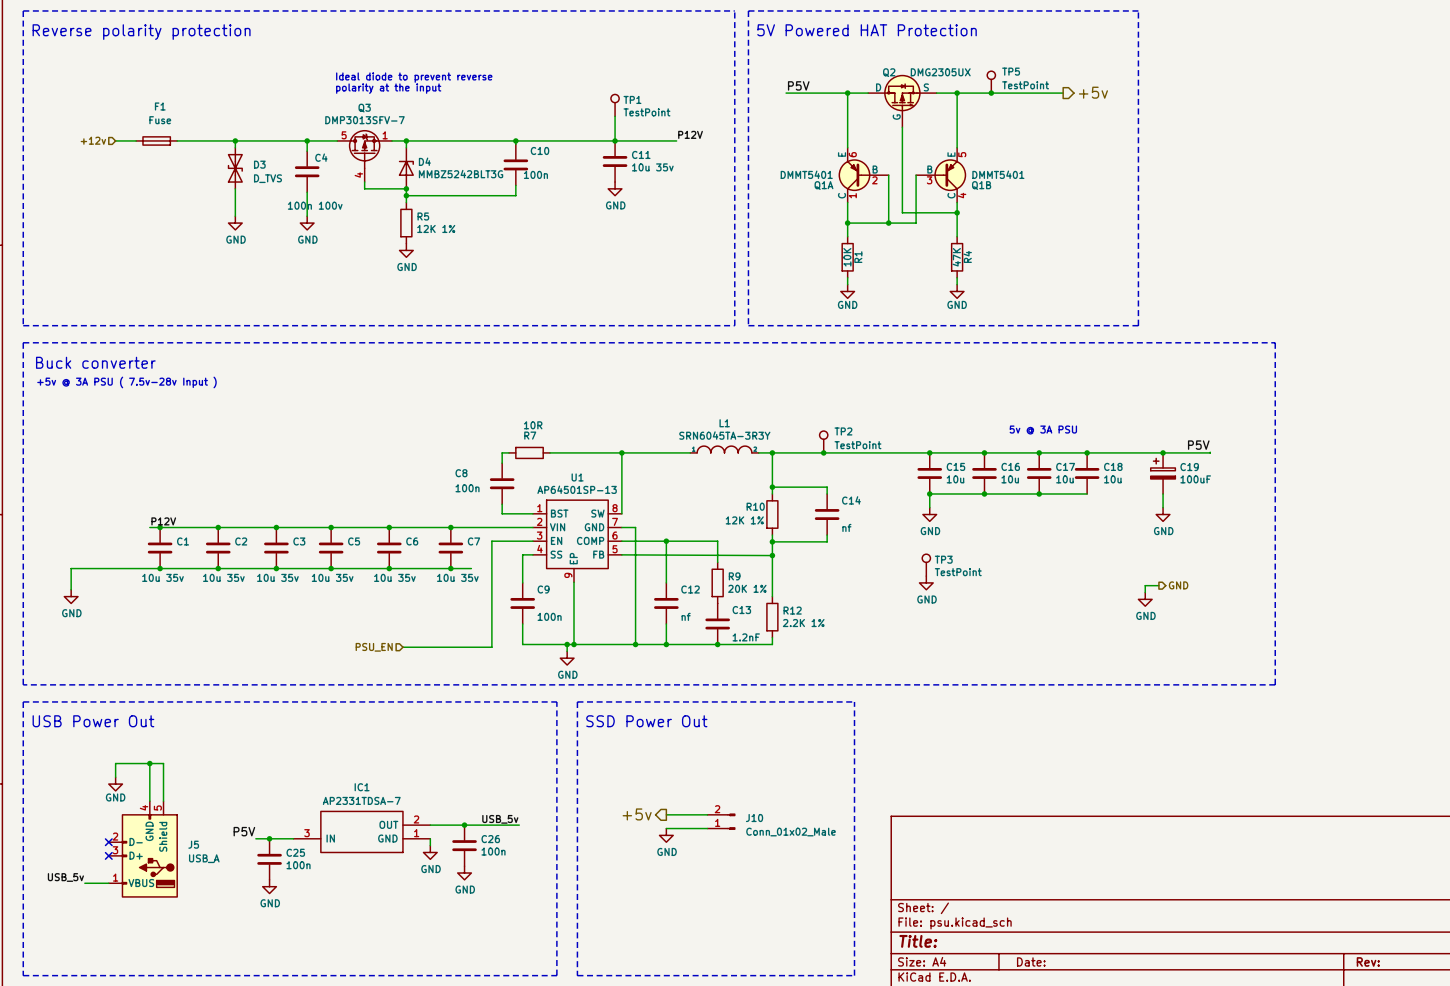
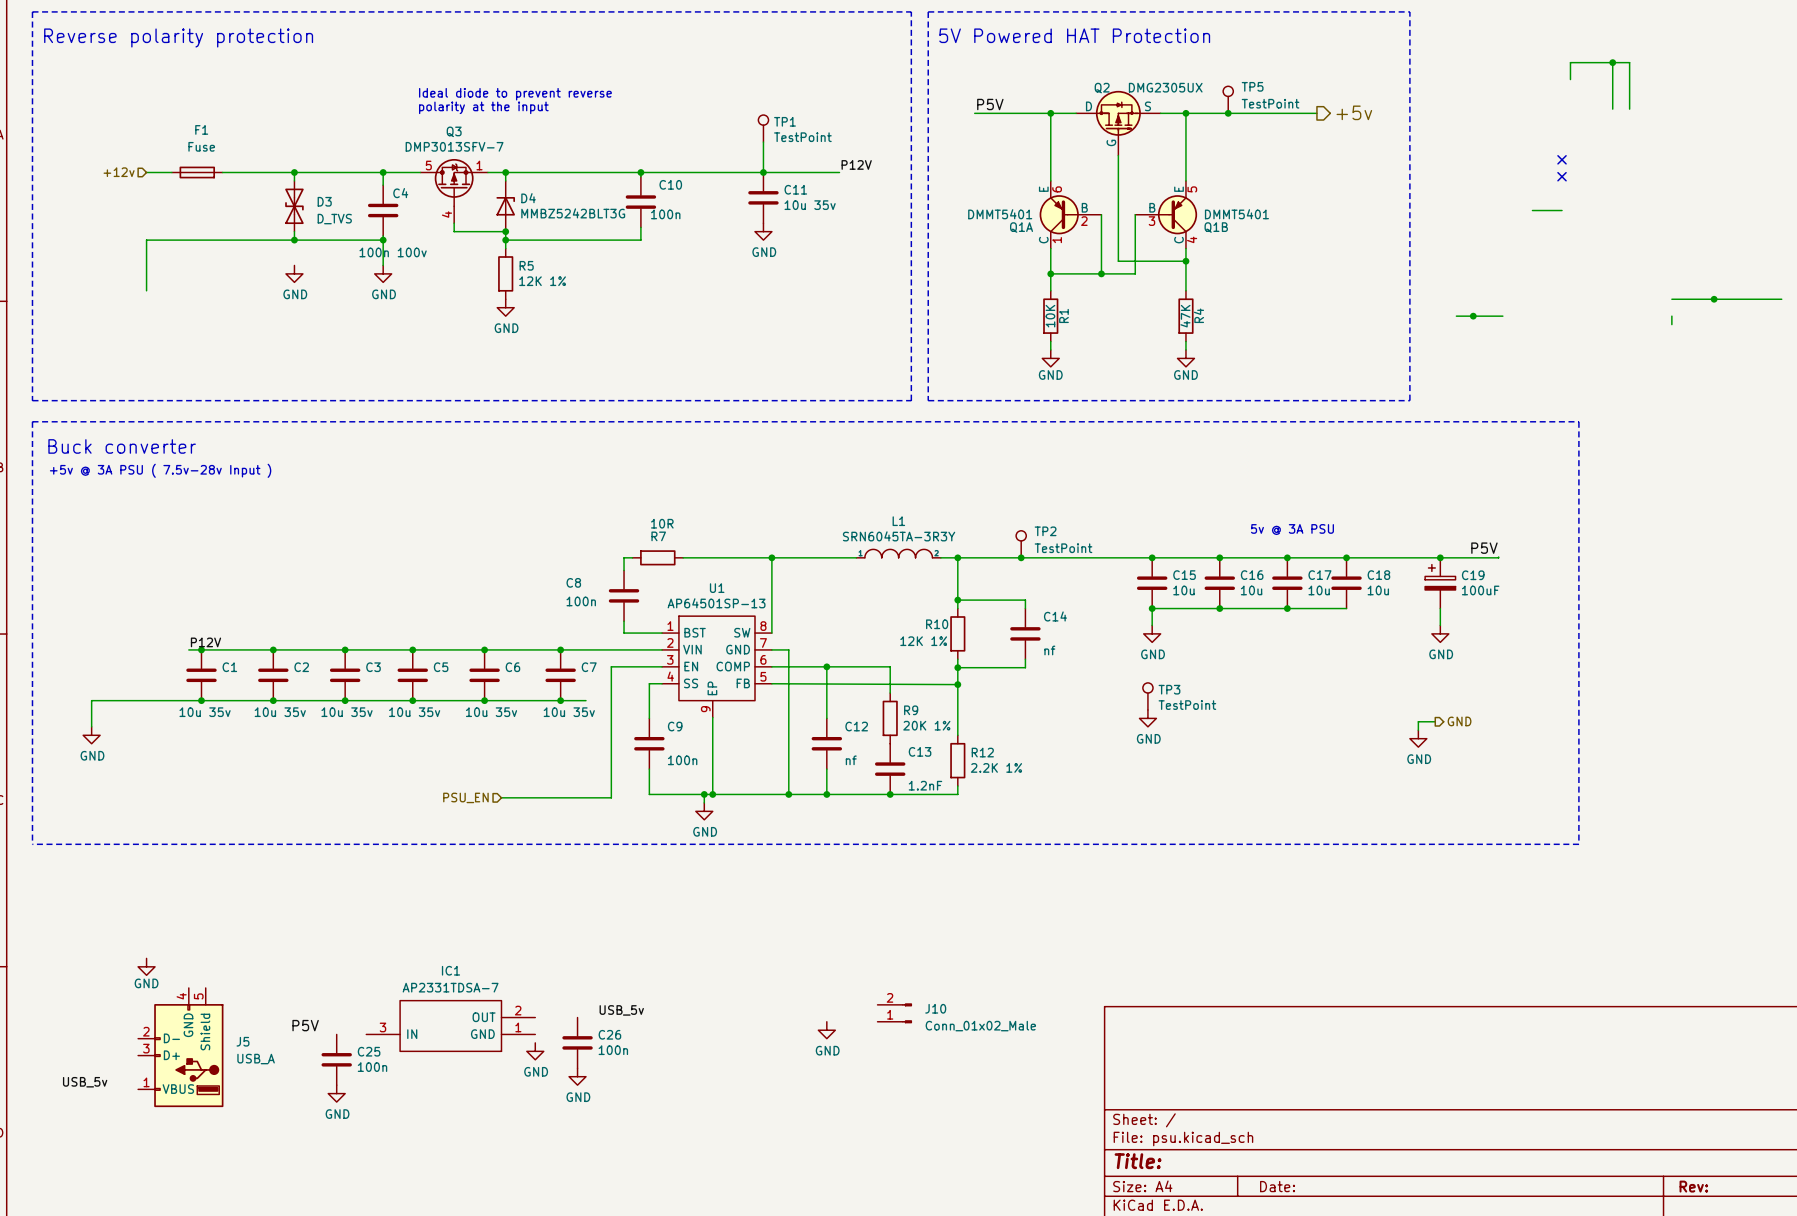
wire: none -> (1612, 62) (1612, 109)
junction: none -> (1612, 62)
wire: none -> (1570, 79) (1570, 62) (1629, 62) (1629, 109)
no-connect mark: none -> (1562, 159)
no-connect mark: none -> (1562, 176)
wire: none -> (1532, 210) (1562, 210)
wire: (235, 195) (235, 216) -> none
junction: none -> (294, 240)
wire: none -> (383, 240) (146, 240) (146, 290)
junction: none -> (383, 240)
wire: none -> (1671, 299) (1781, 299)
junction: none -> (1714, 299)
wire: none -> (1456, 316) (1502, 316)
junction: none -> (1473, 316)
wire: none -> (1671, 316) (1671, 324)
line: (23, 701) (23, 975) (556, 975) (556, 701) (23, 701) -> none
line: (577, 701) (854, 701) (854, 975) (577, 975) (577, 701) -> none
text: USB Power Out (93, 721) -> none
text: SSD Power Out (646, 721) -> none
wire: (149, 763) (149, 801) -> none
junction: (149, 763) -> none
wire: (115, 777) (115, 763) (163, 763) (163, 801) -> none
hierarchical label: +5v (637, 814) -> none
wire: (666, 814) (707, 814) -> none
wire: (430, 825) (519, 825) -> none
junction: (464, 825) -> none
wire: (666, 828) (707, 828) -> none
wire: (255, 838) (293, 838) -> none
junction: (269, 838) -> none
wire: (430, 838) (430, 845) -> none
no-connect mark: (108, 842) -> none
no-connect mark: (108, 855) -> none
wire: (84, 883) (108, 883) -> none

